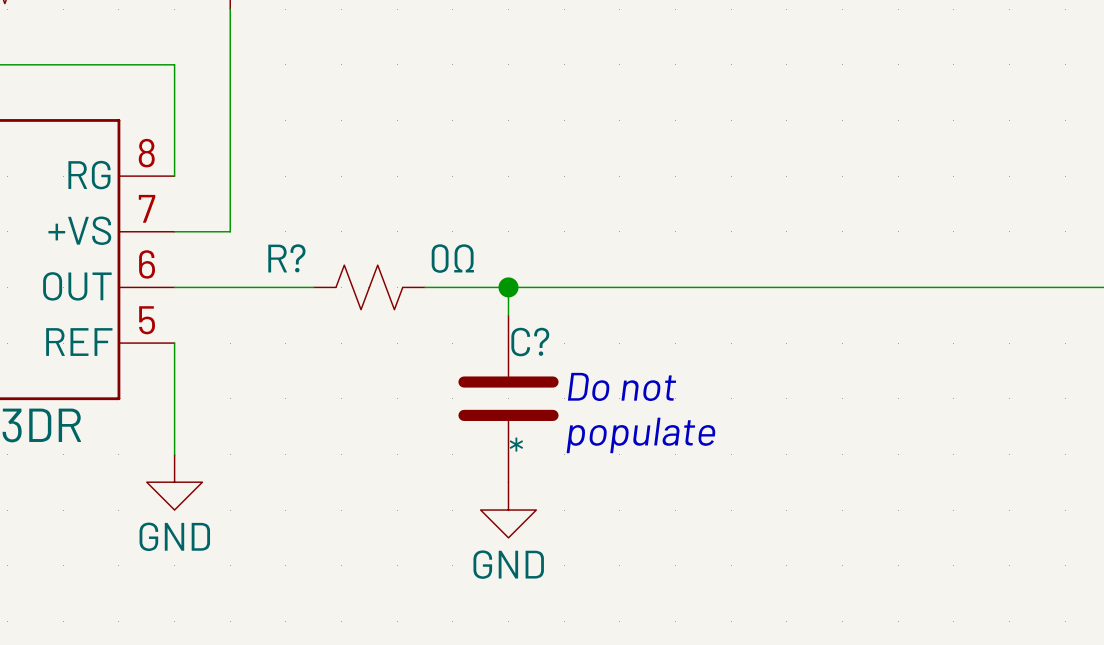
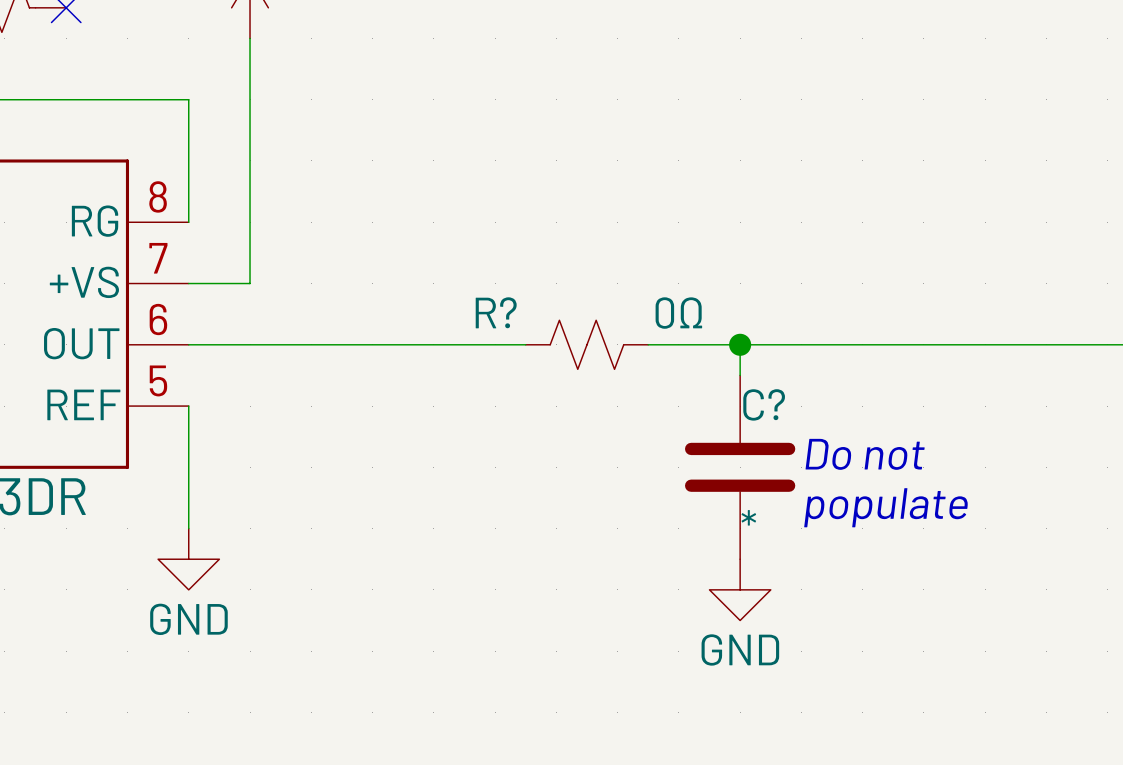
R? position: (369, 287) -> (586, 344)
wire: (480, 287) (591, 287) -> (341, 344) (464, 344)
wire: (508, 287) (508, 315) -> (740, 344) (740, 375)
junction: (508, 287) -> none
junction: none -> (740, 344)
text position: Do not (622, 386) -> Do not (865, 454)
C? position: (508, 398) -> (740, 467)
text position: populate (640, 435) -> populate (885, 507)
power symbol position: GND (508, 510) -> GND (740, 589)

